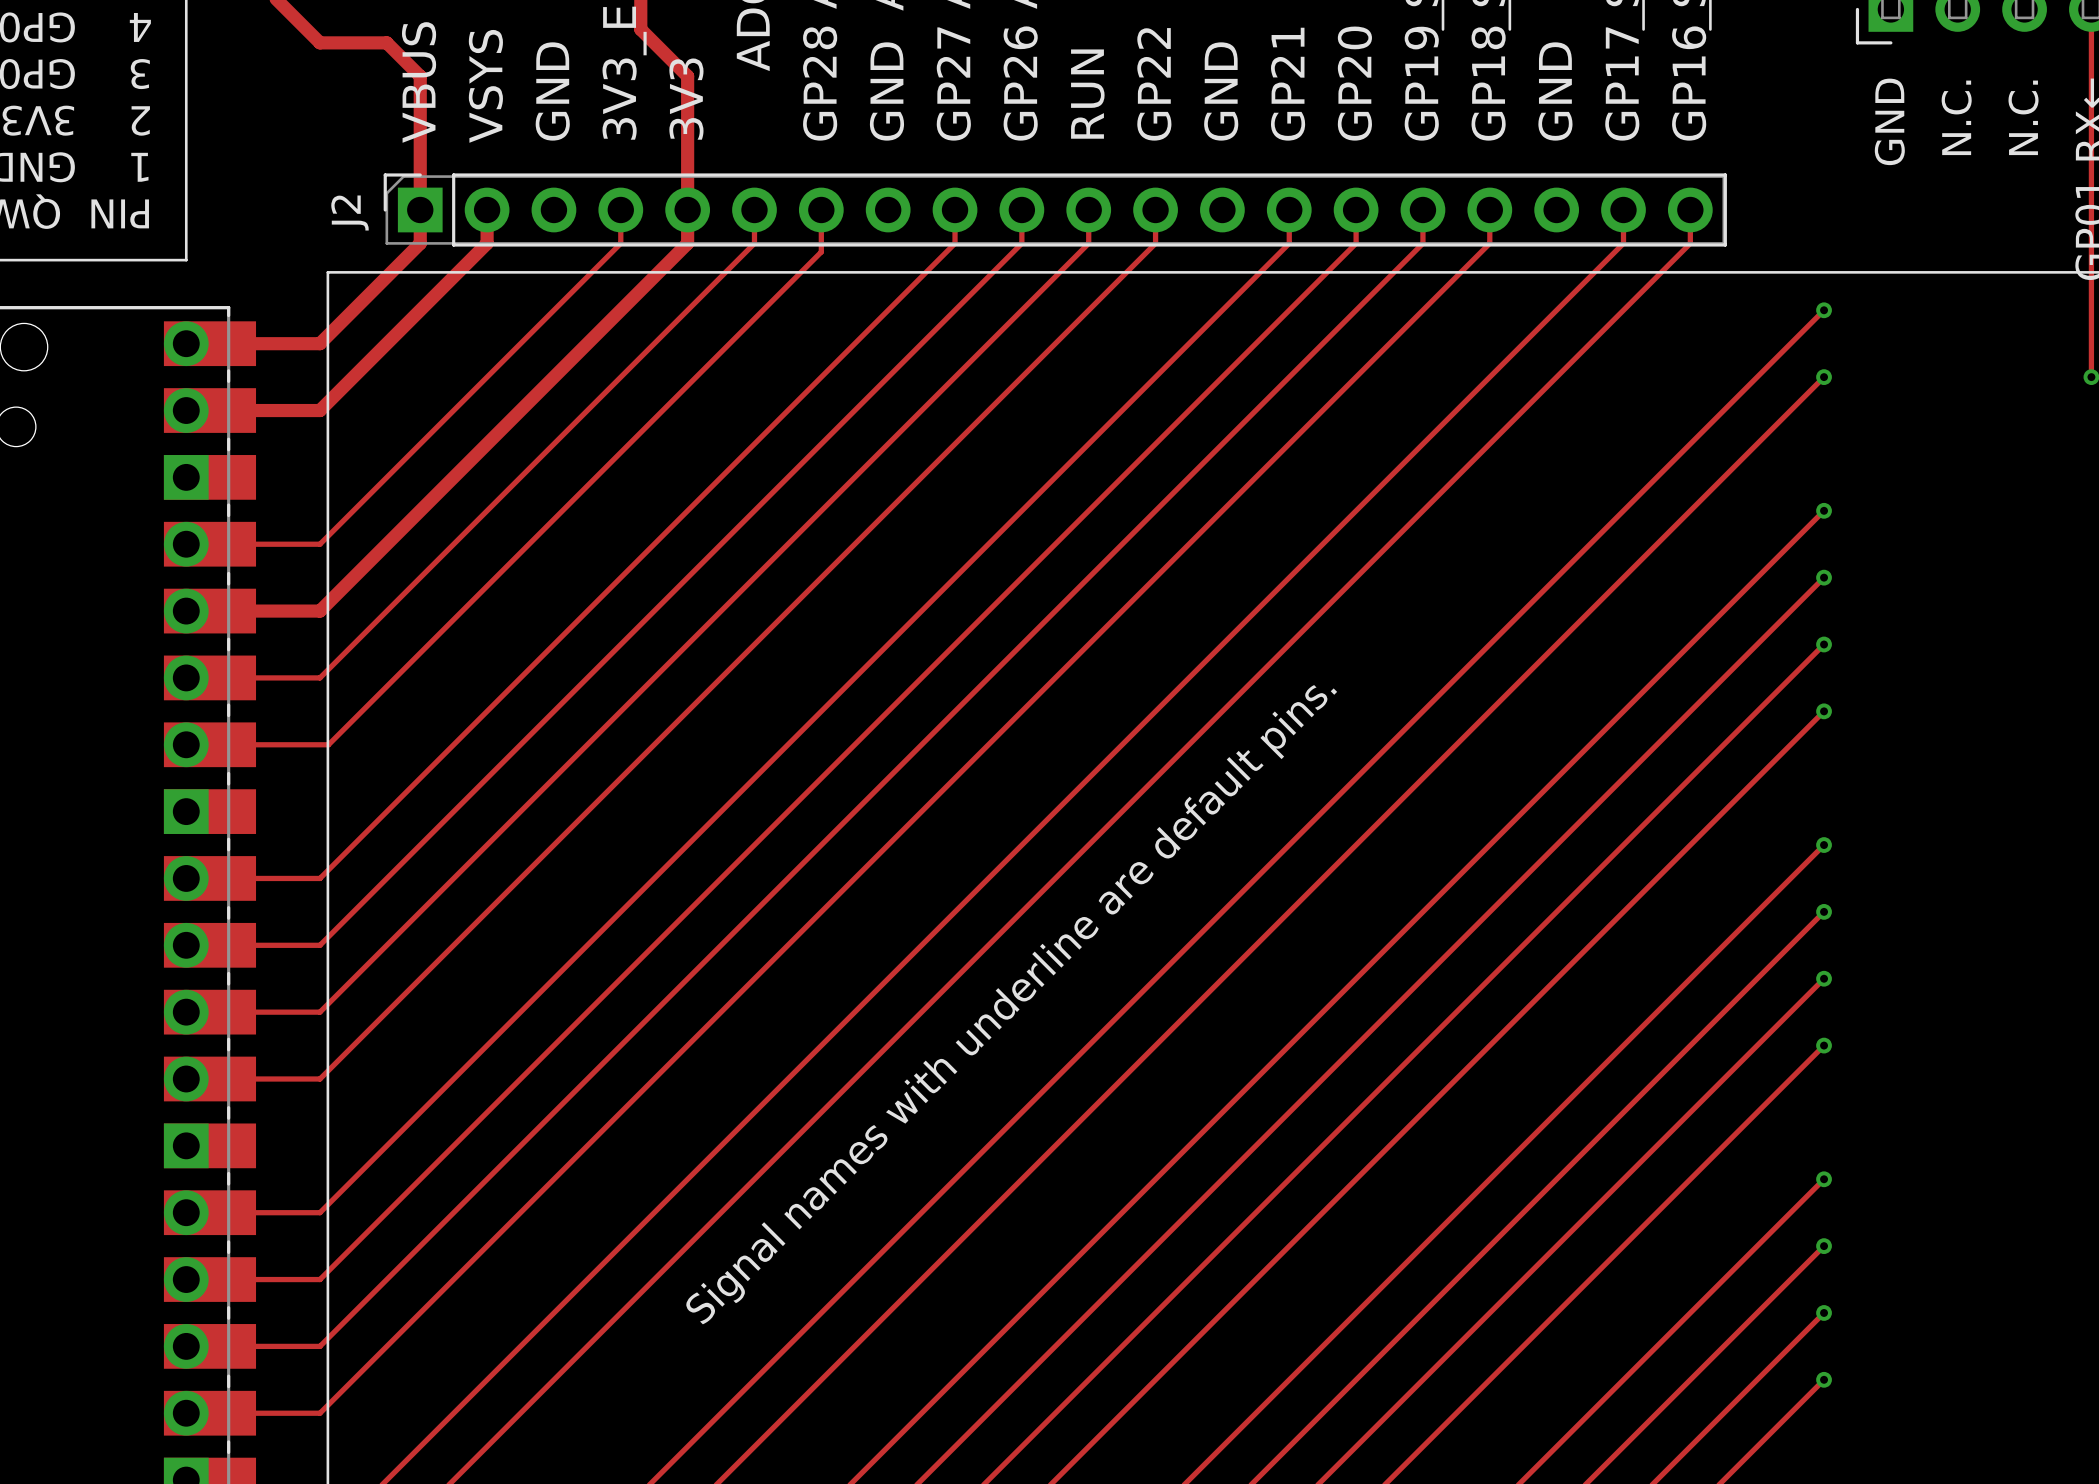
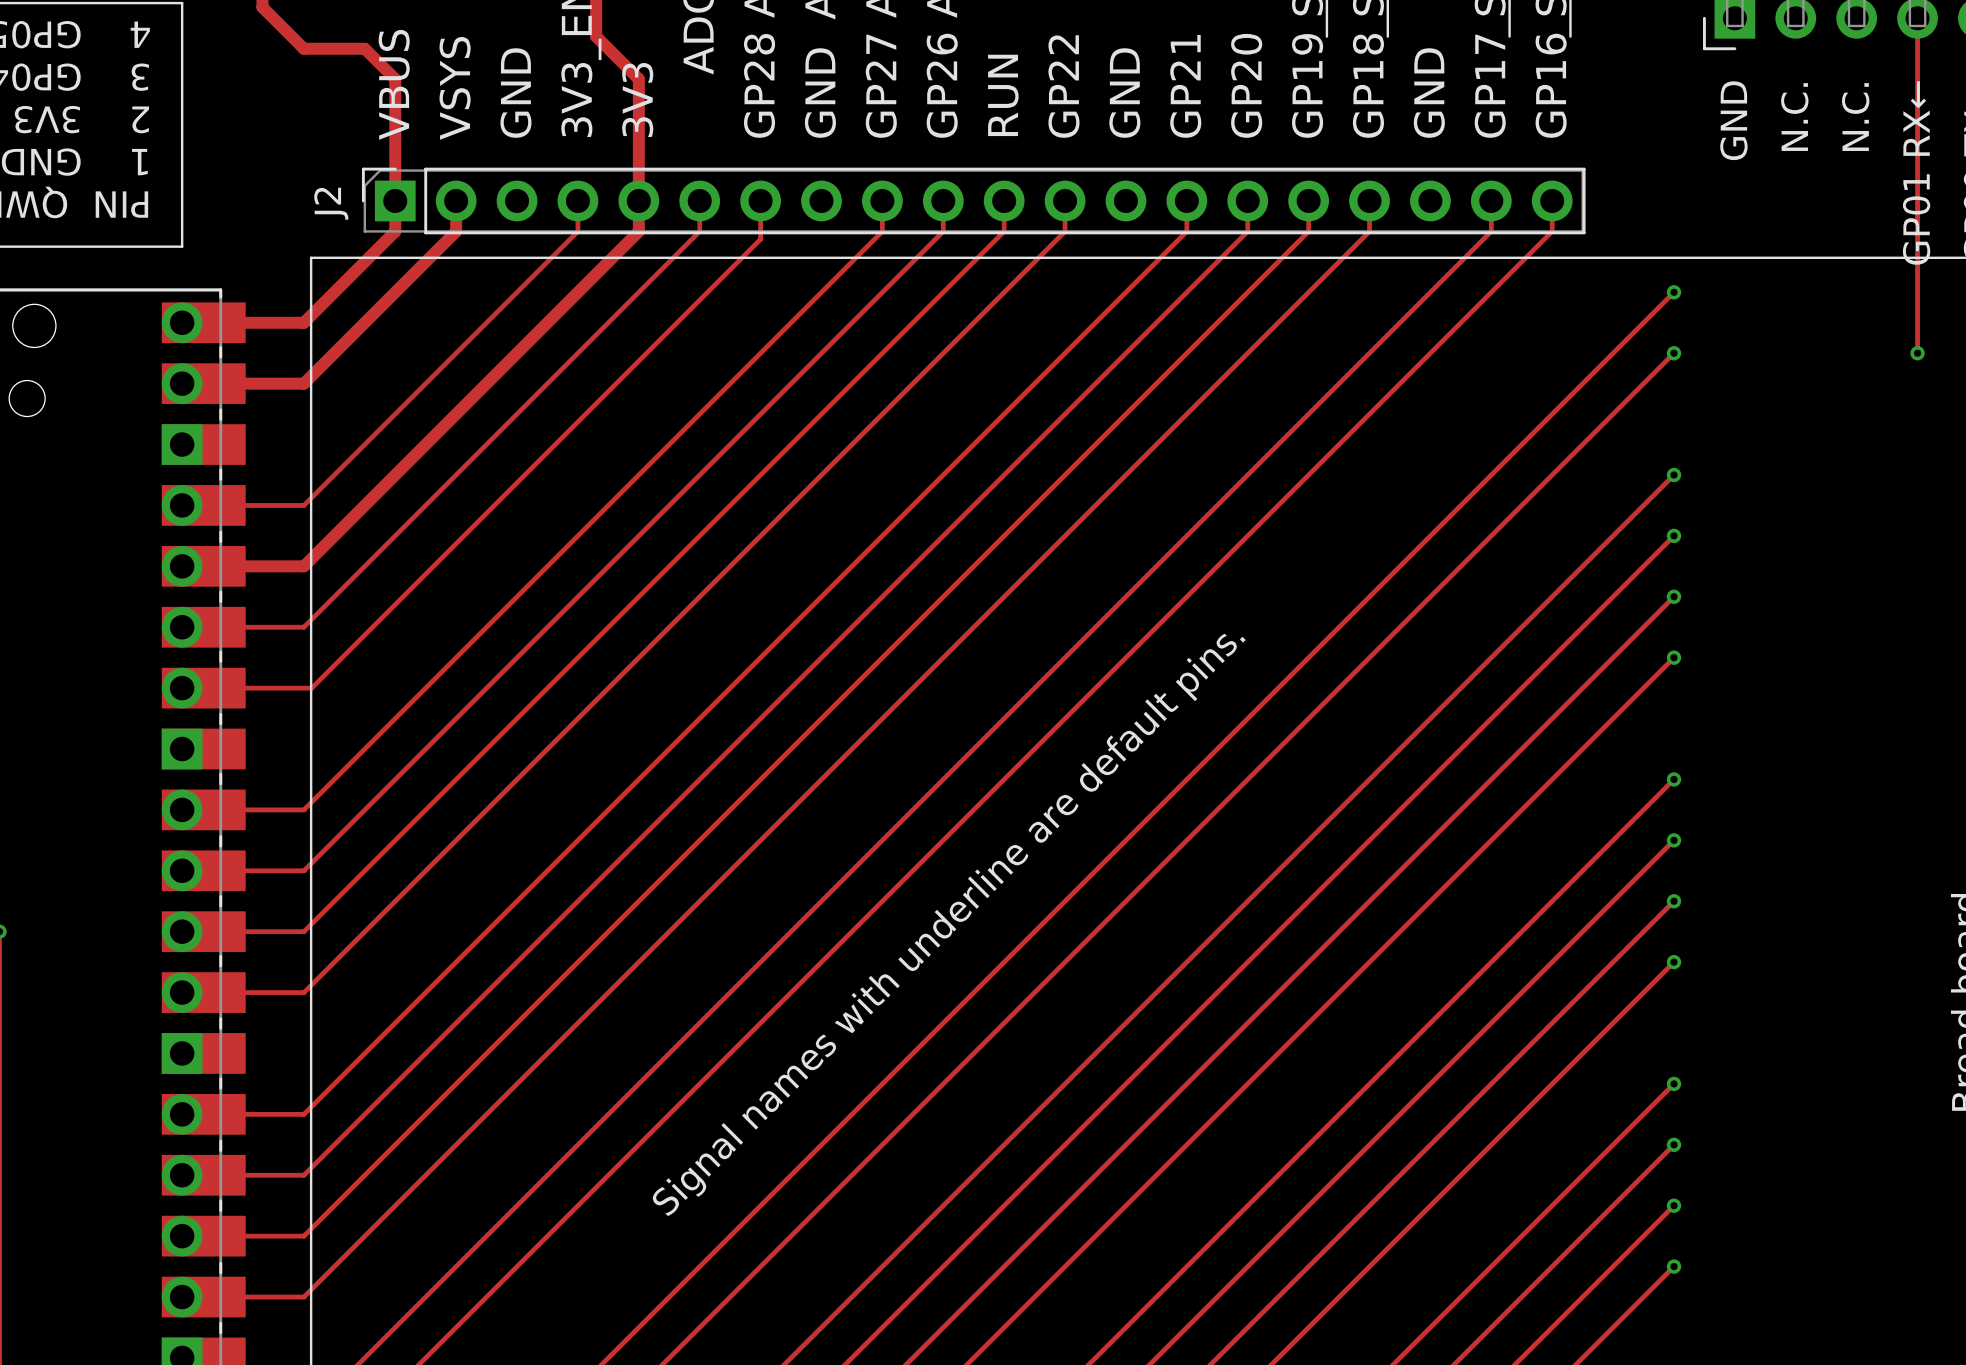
text position: Signal names with underline are default pins. (1011, 1004) -> Signal names with underline are default pins. (949, 924)

